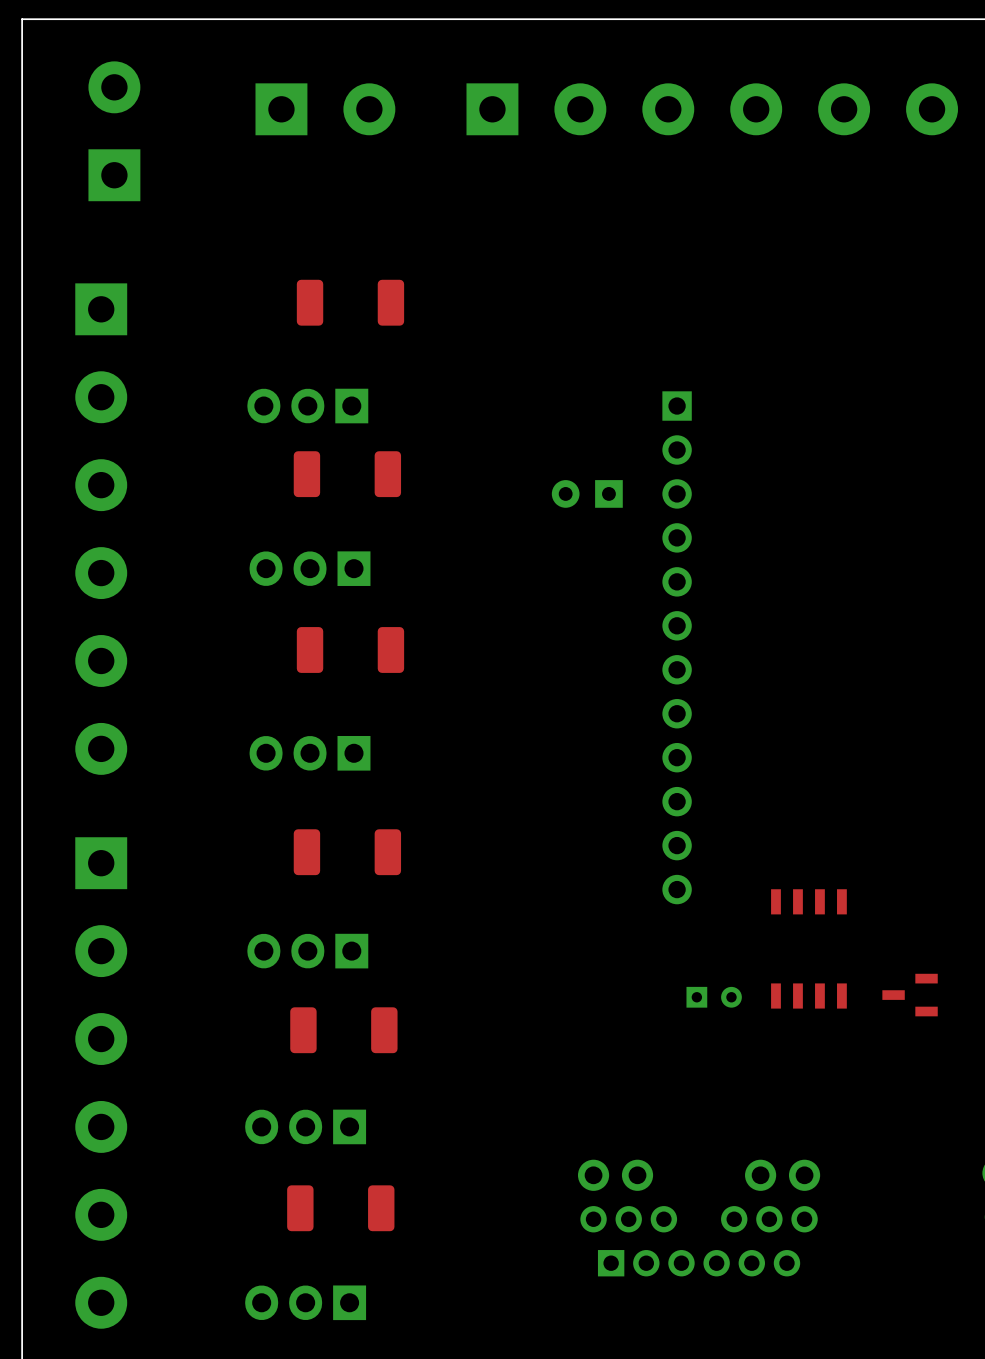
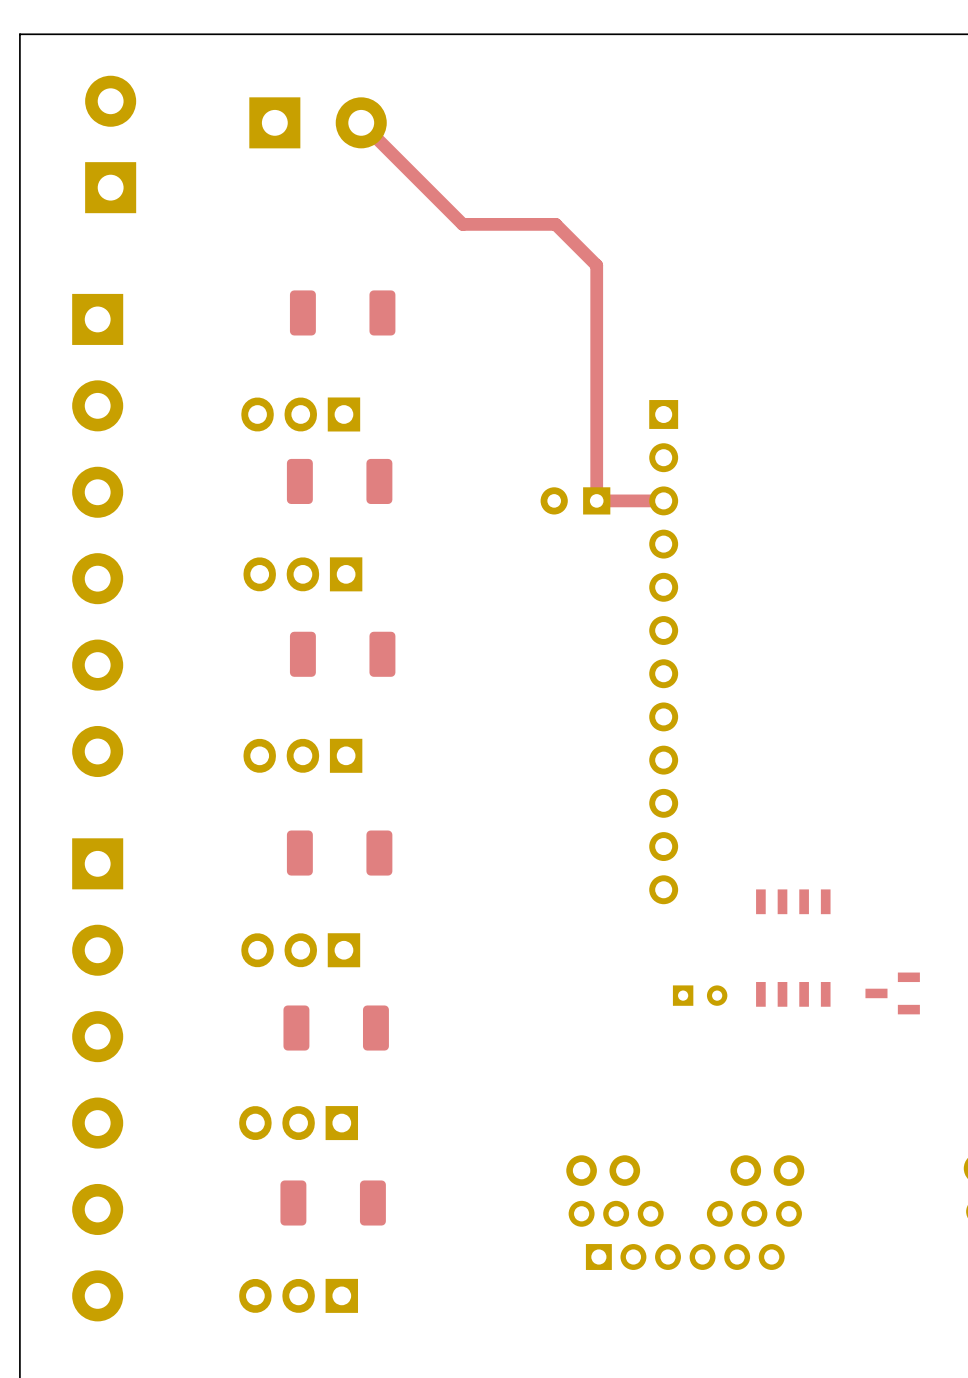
top track: none -> (361, 122) (462, 224) (555, 224) (596, 265) (596, 500) (663, 500)
part: (712, 109) -> none

